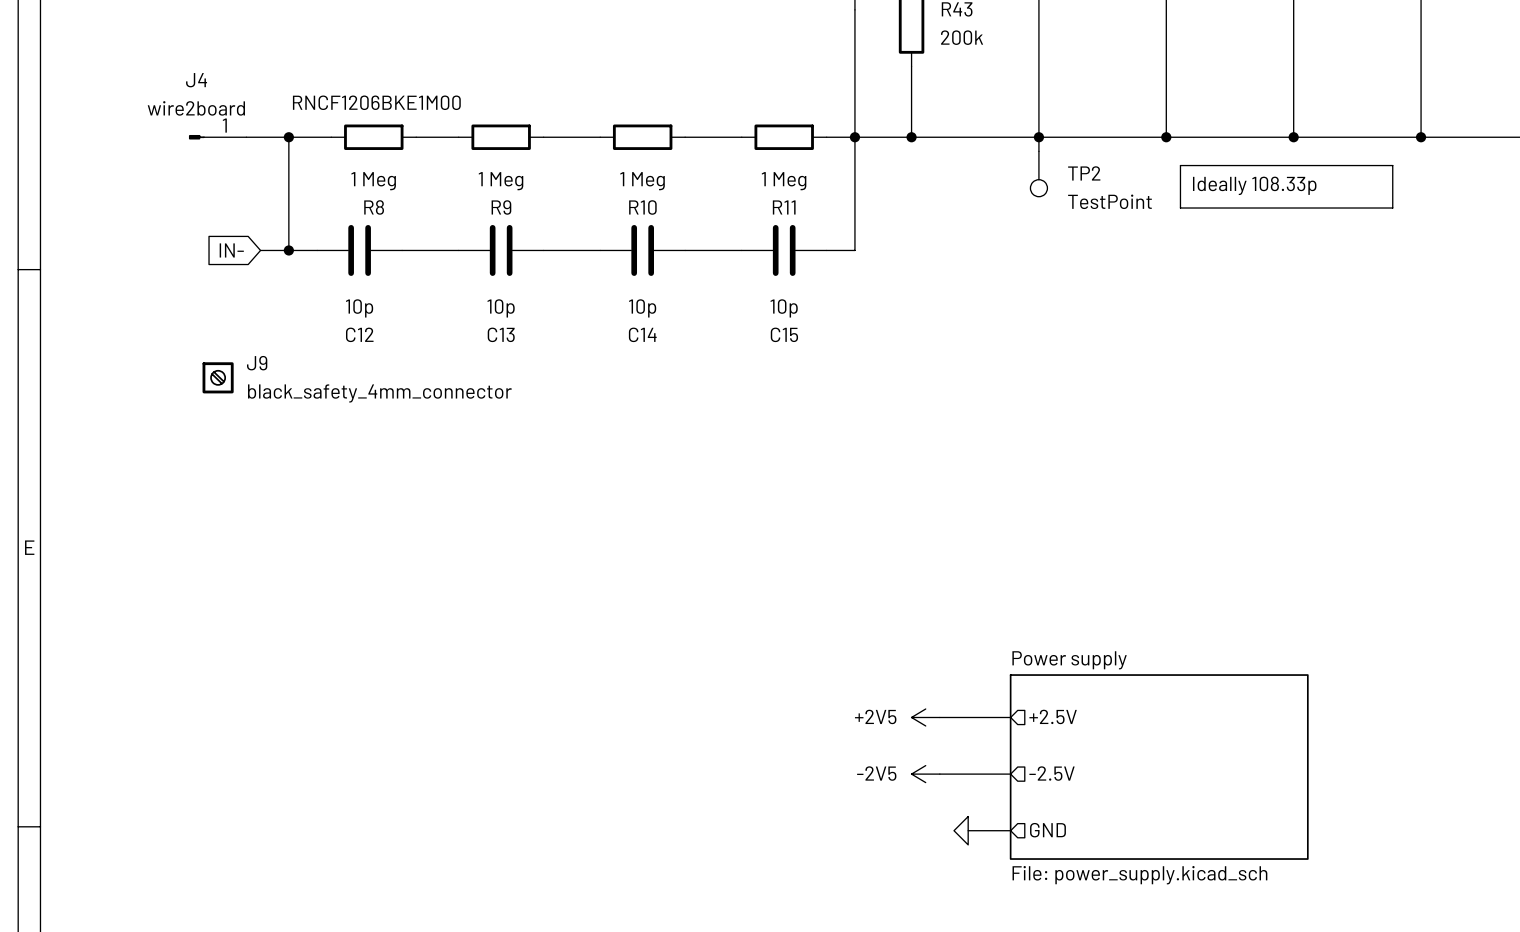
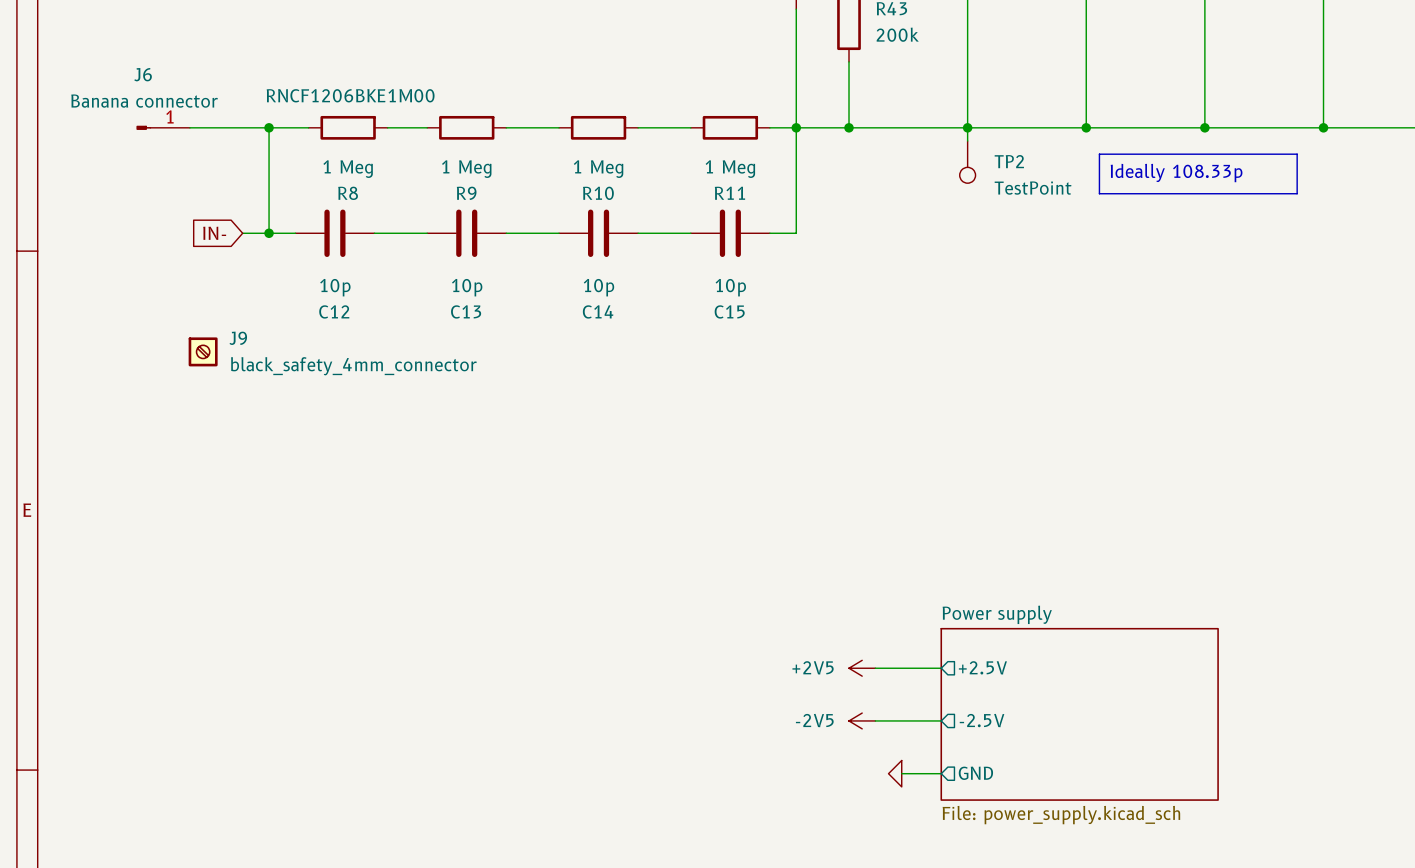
J6: none -> Banana connector (163, 127)
J4: wire2board (217, 137) -> none

